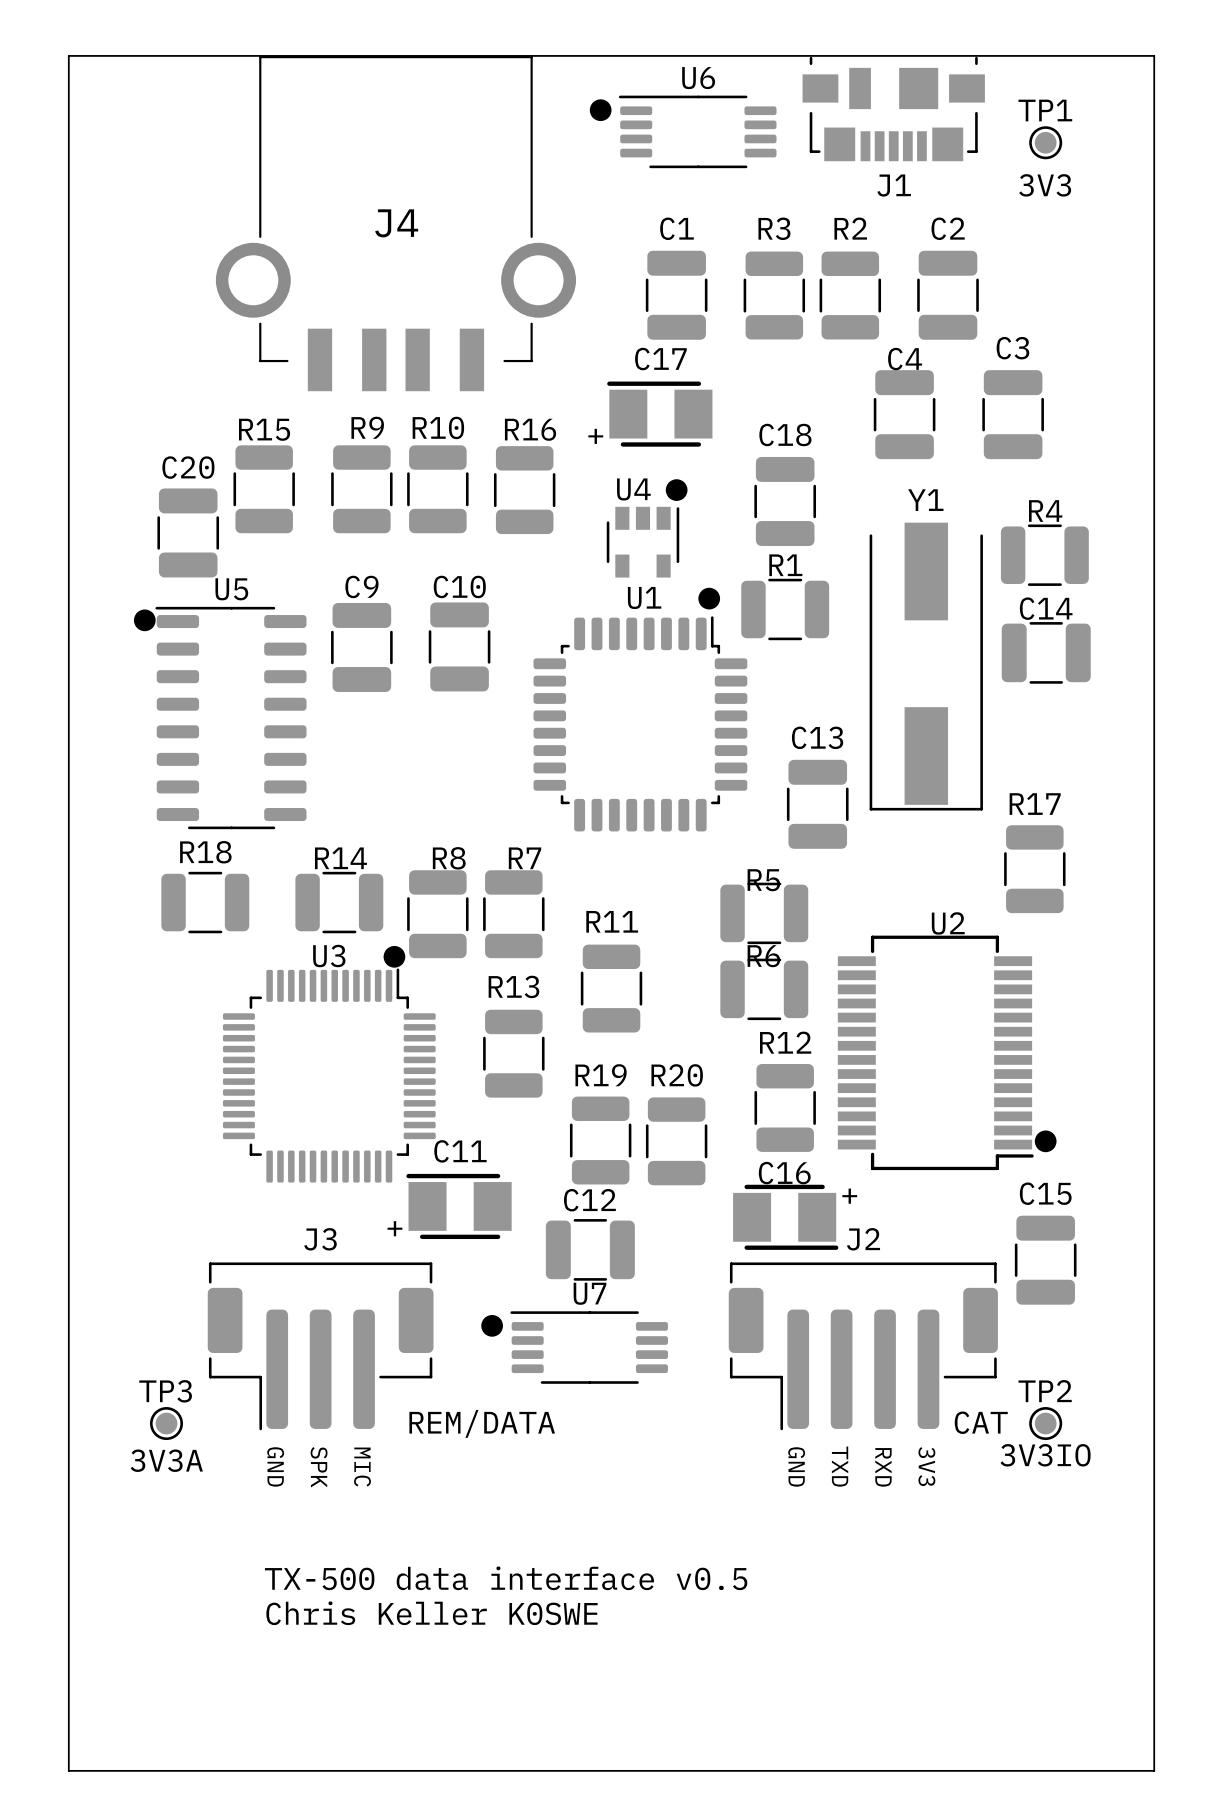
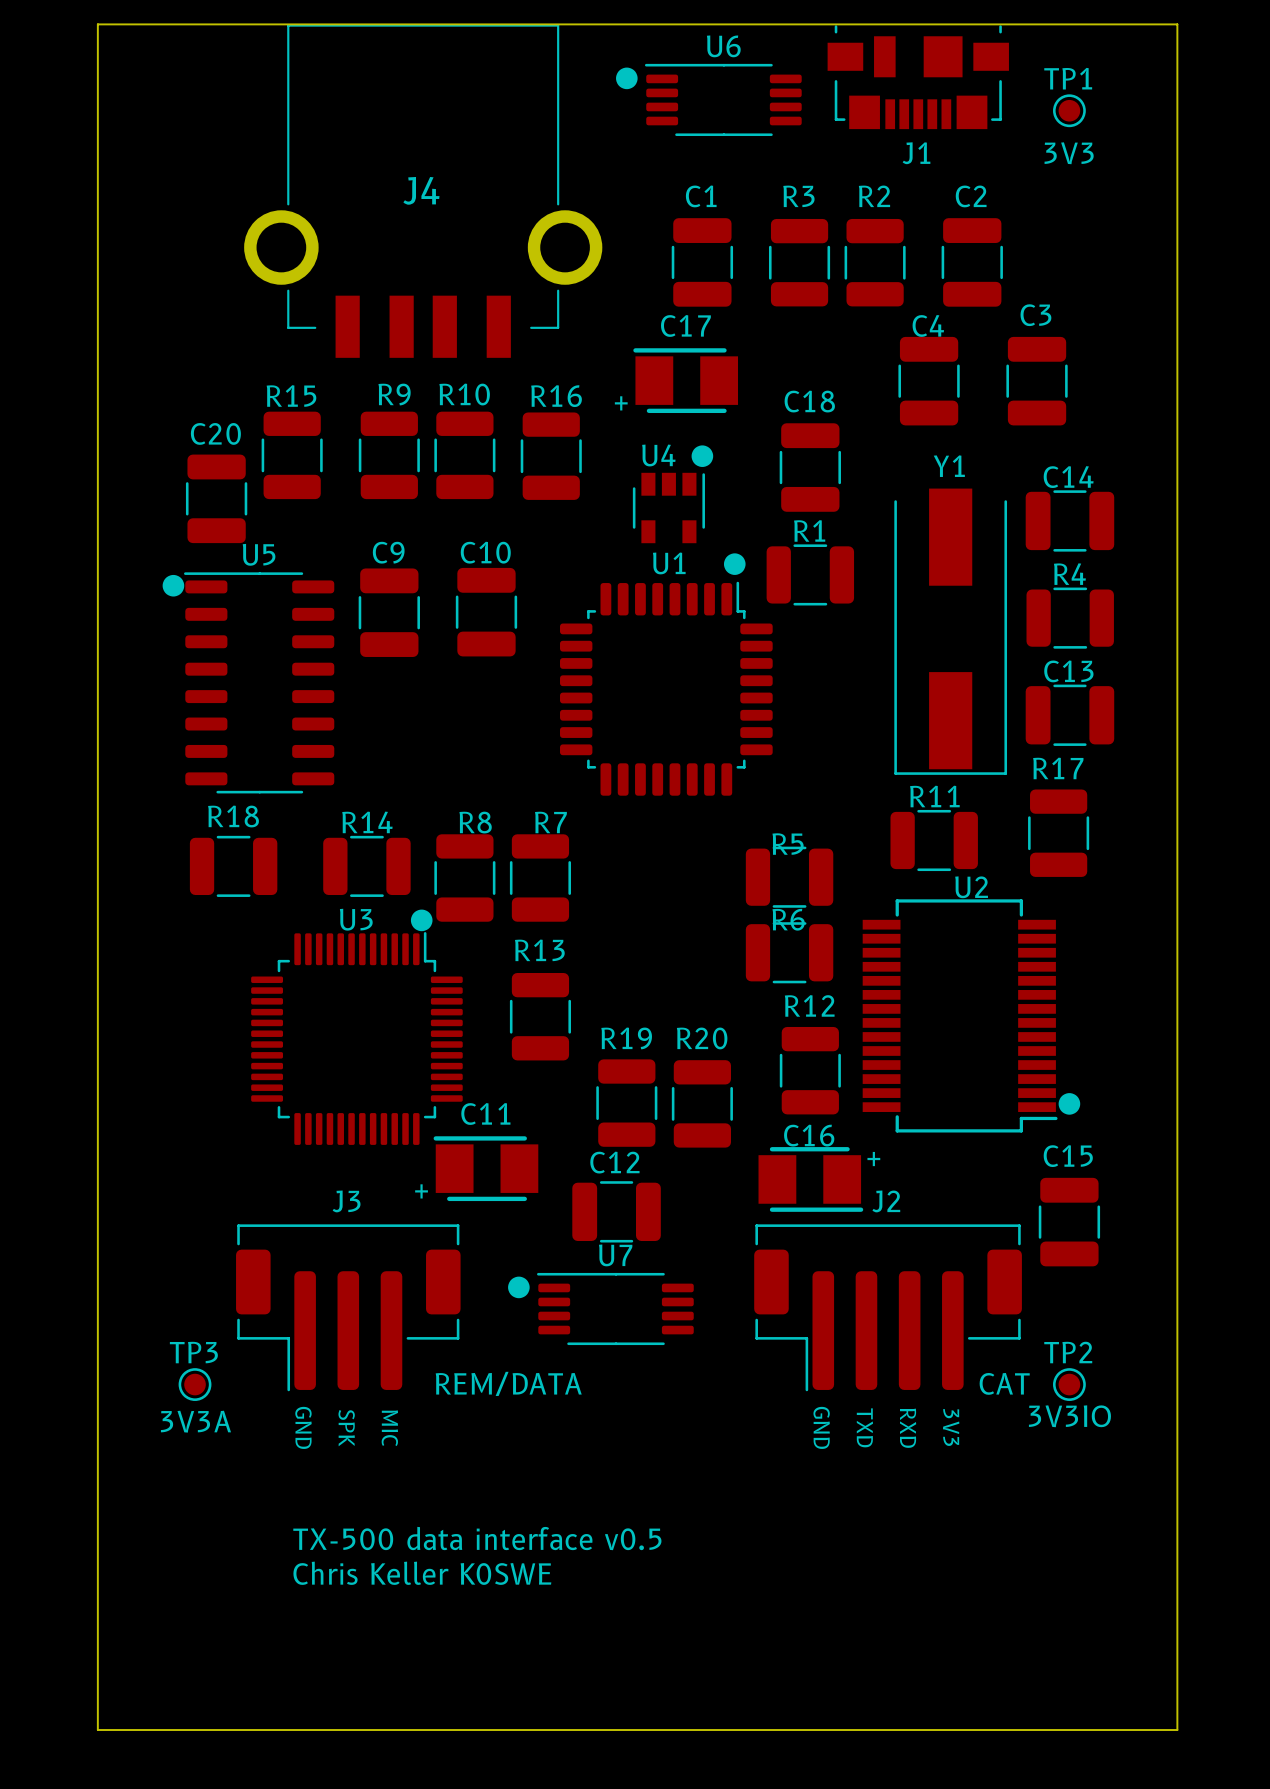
R4 position: (1044, 555) -> (1070, 618)
C14 position: (1046, 652) -> (1069, 520)
C13 rotation: 0° (817, 804) -> 90° clockwise (1069, 715)
C13 position: (817, 804) -> (1069, 715)
R11 rotation: 0° (611, 988) -> 90° clockwise (934, 840)
R11 position: (611, 988) -> (934, 840)

